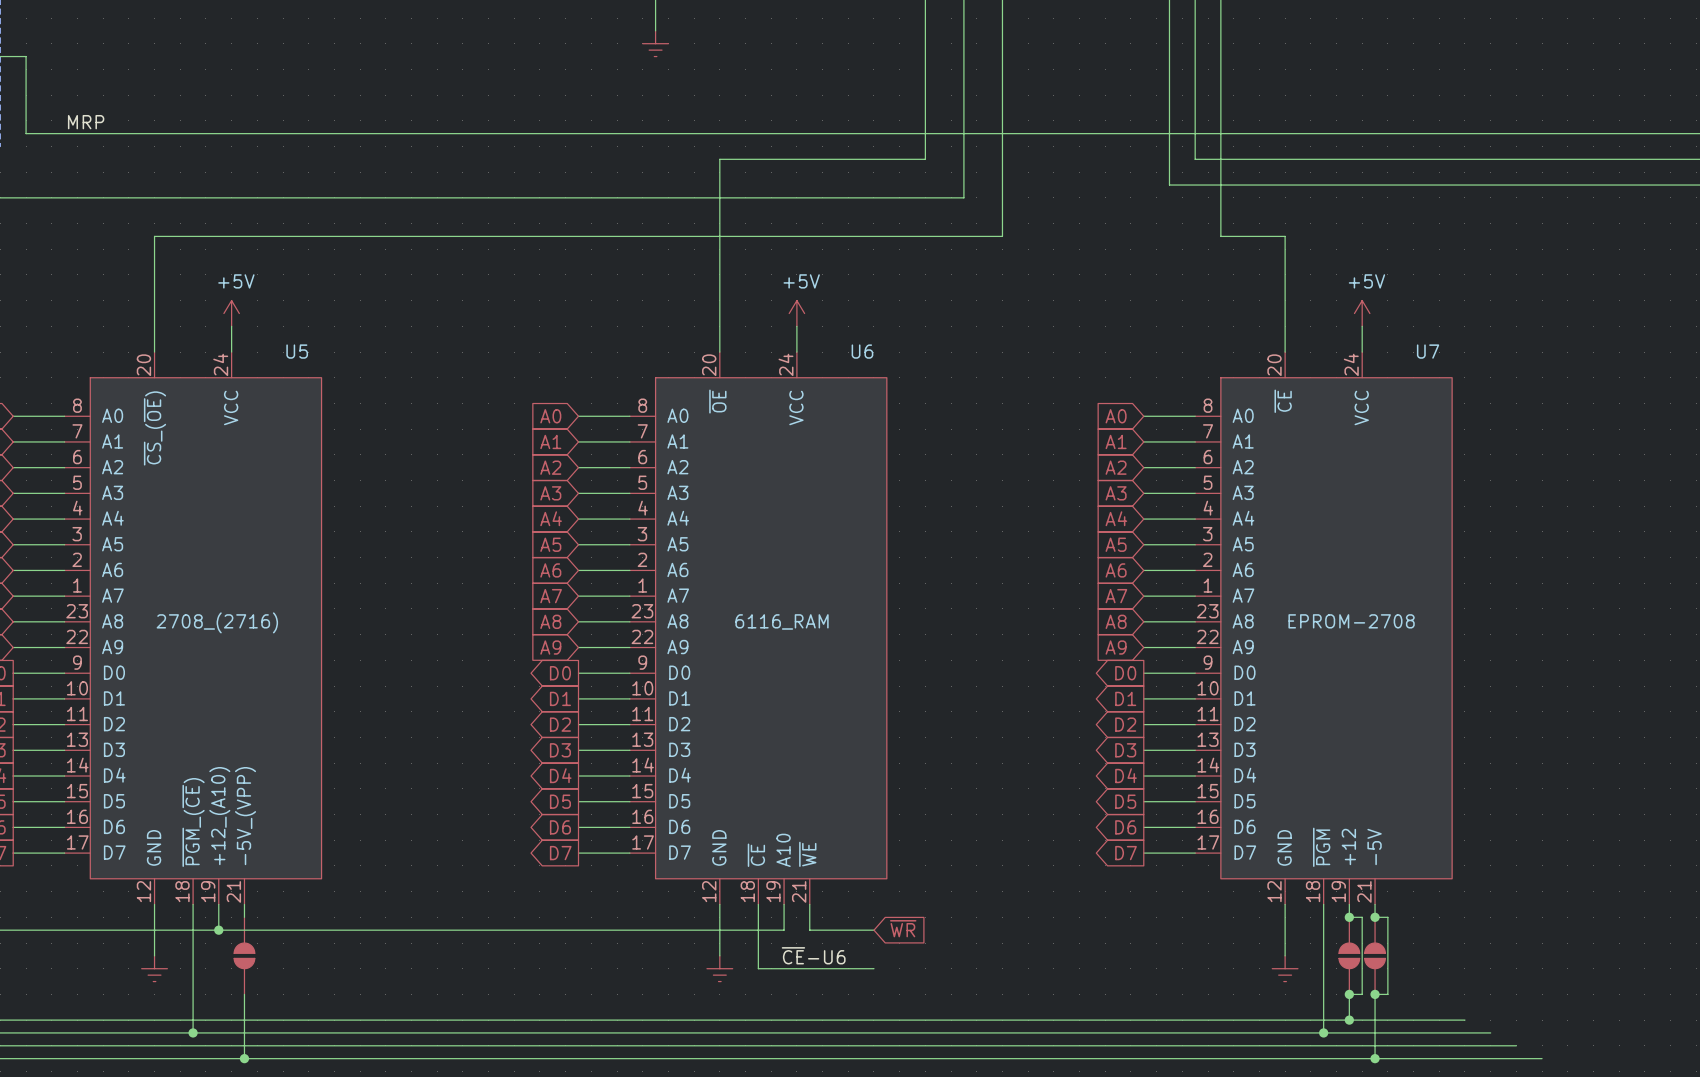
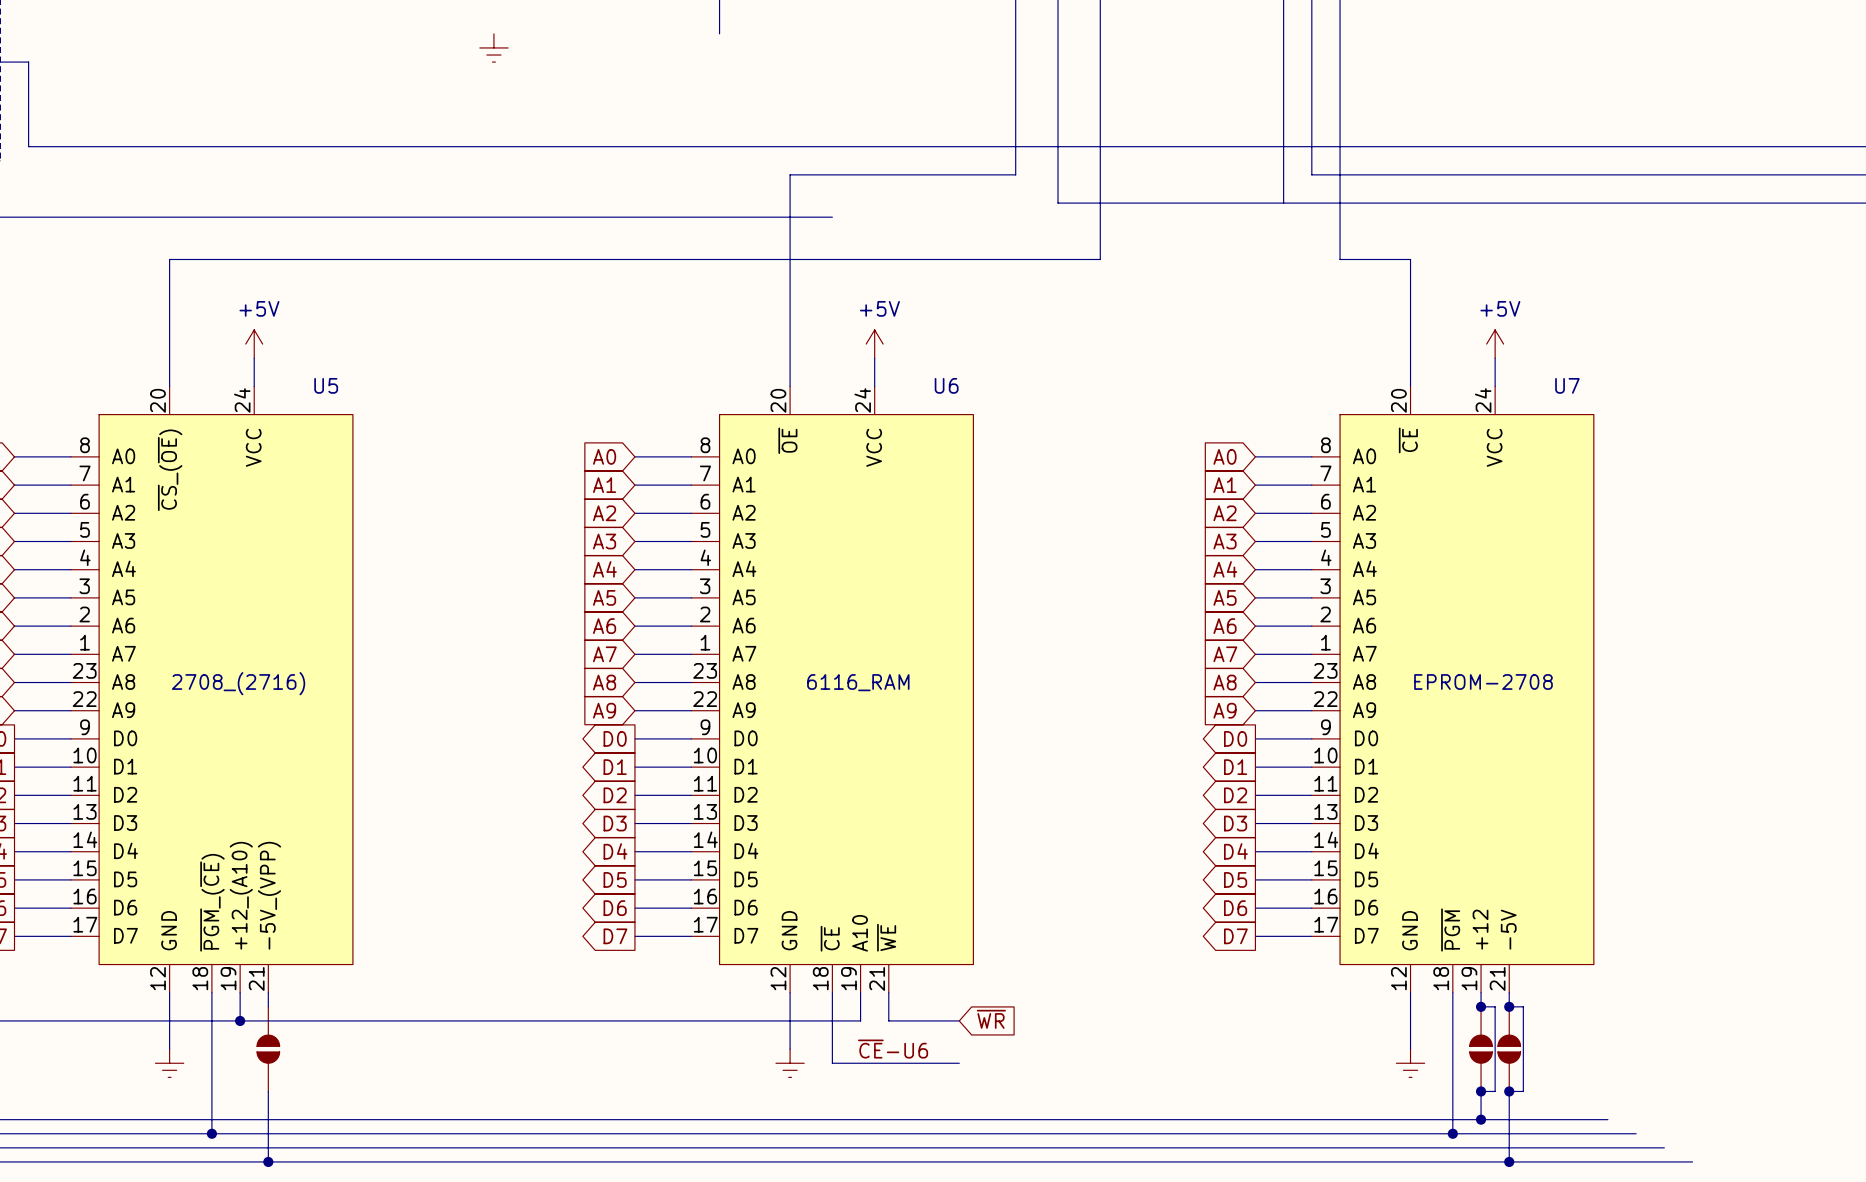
power symbol position: (655, 43) -> (493, 47)
label: MRP (86, 122) -> none
wire: (963, 185) (963, 197) (758, 197) -> (1057, 203) (1283, 203)

